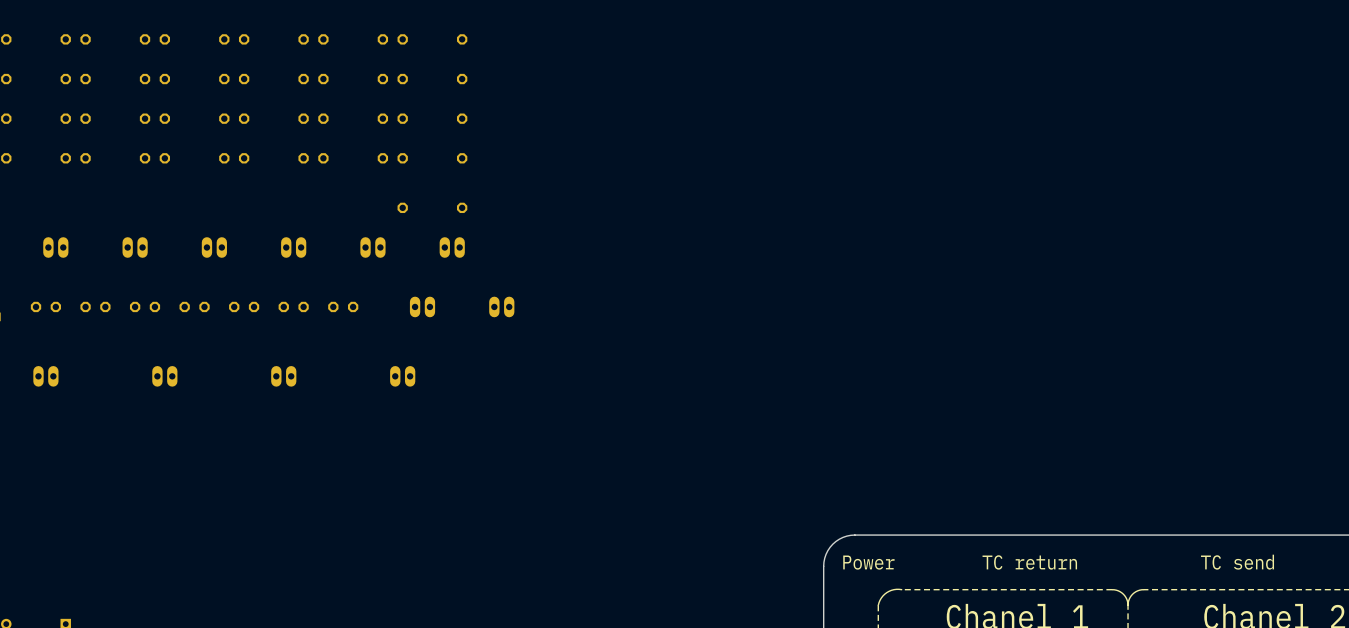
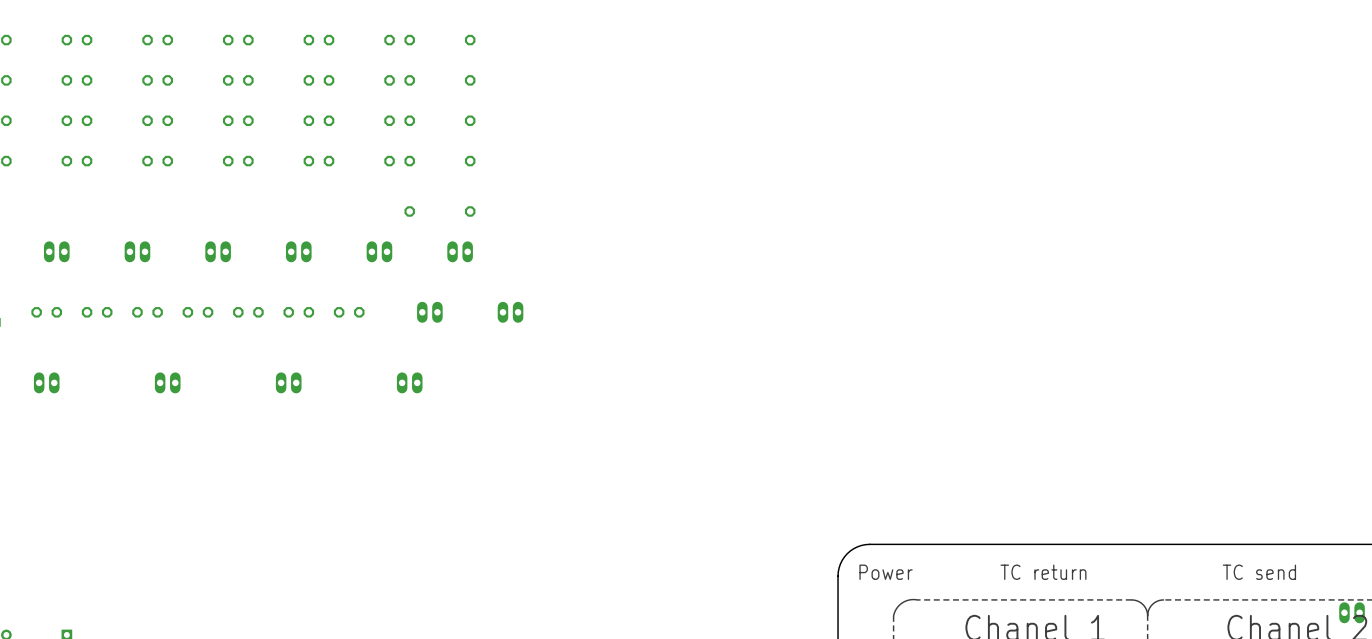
part: none -> (1352, 612)

